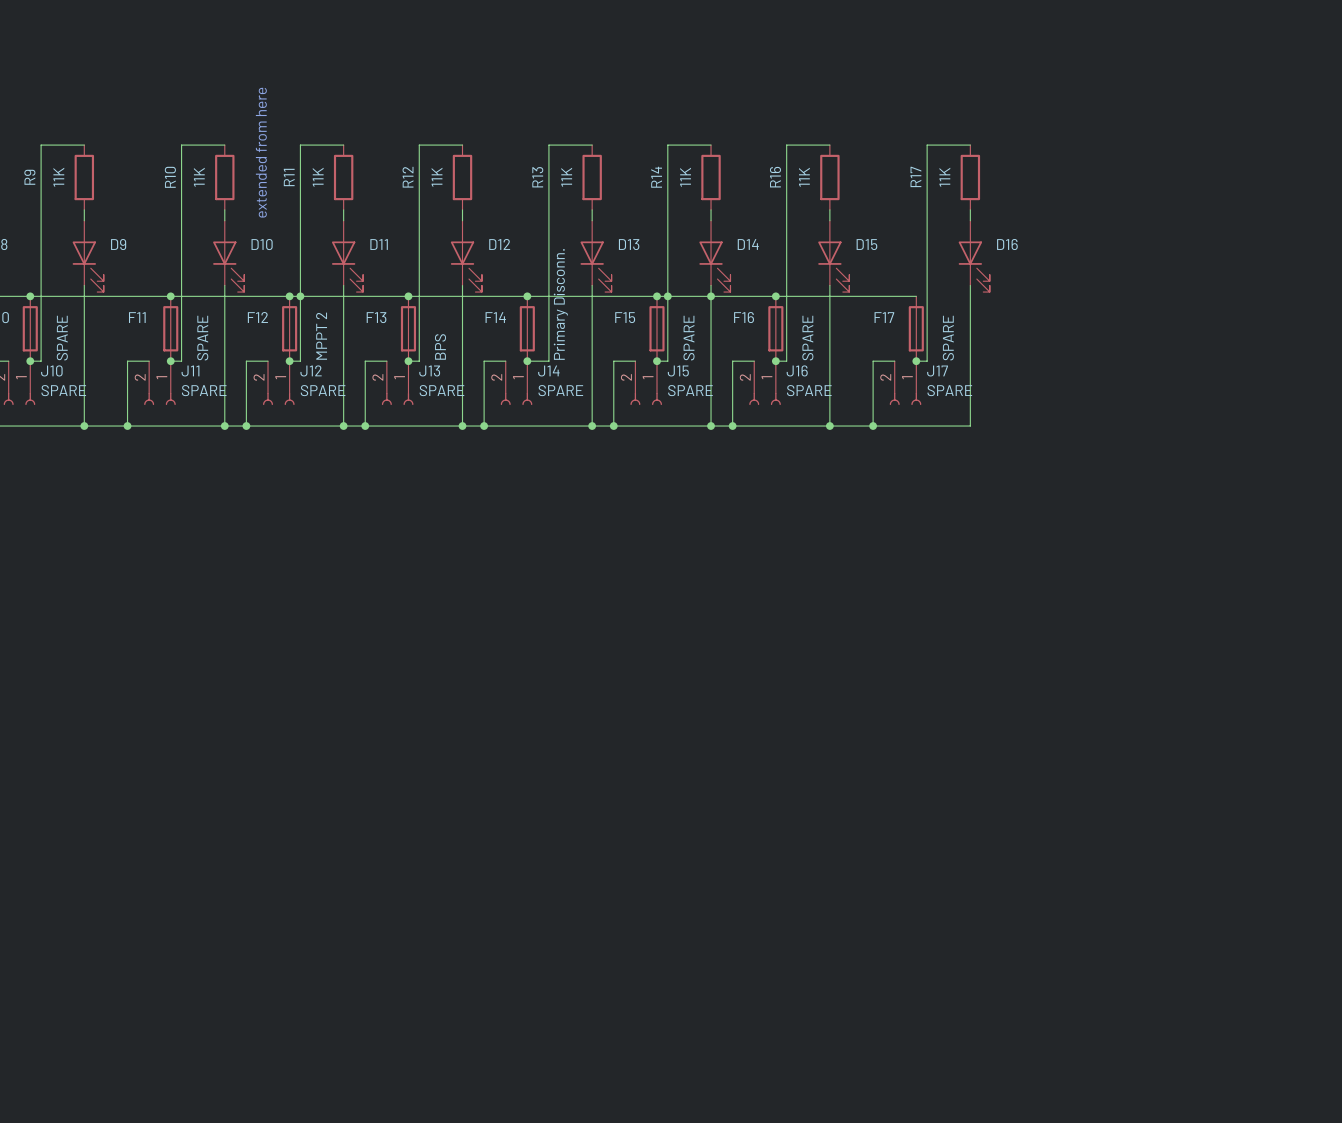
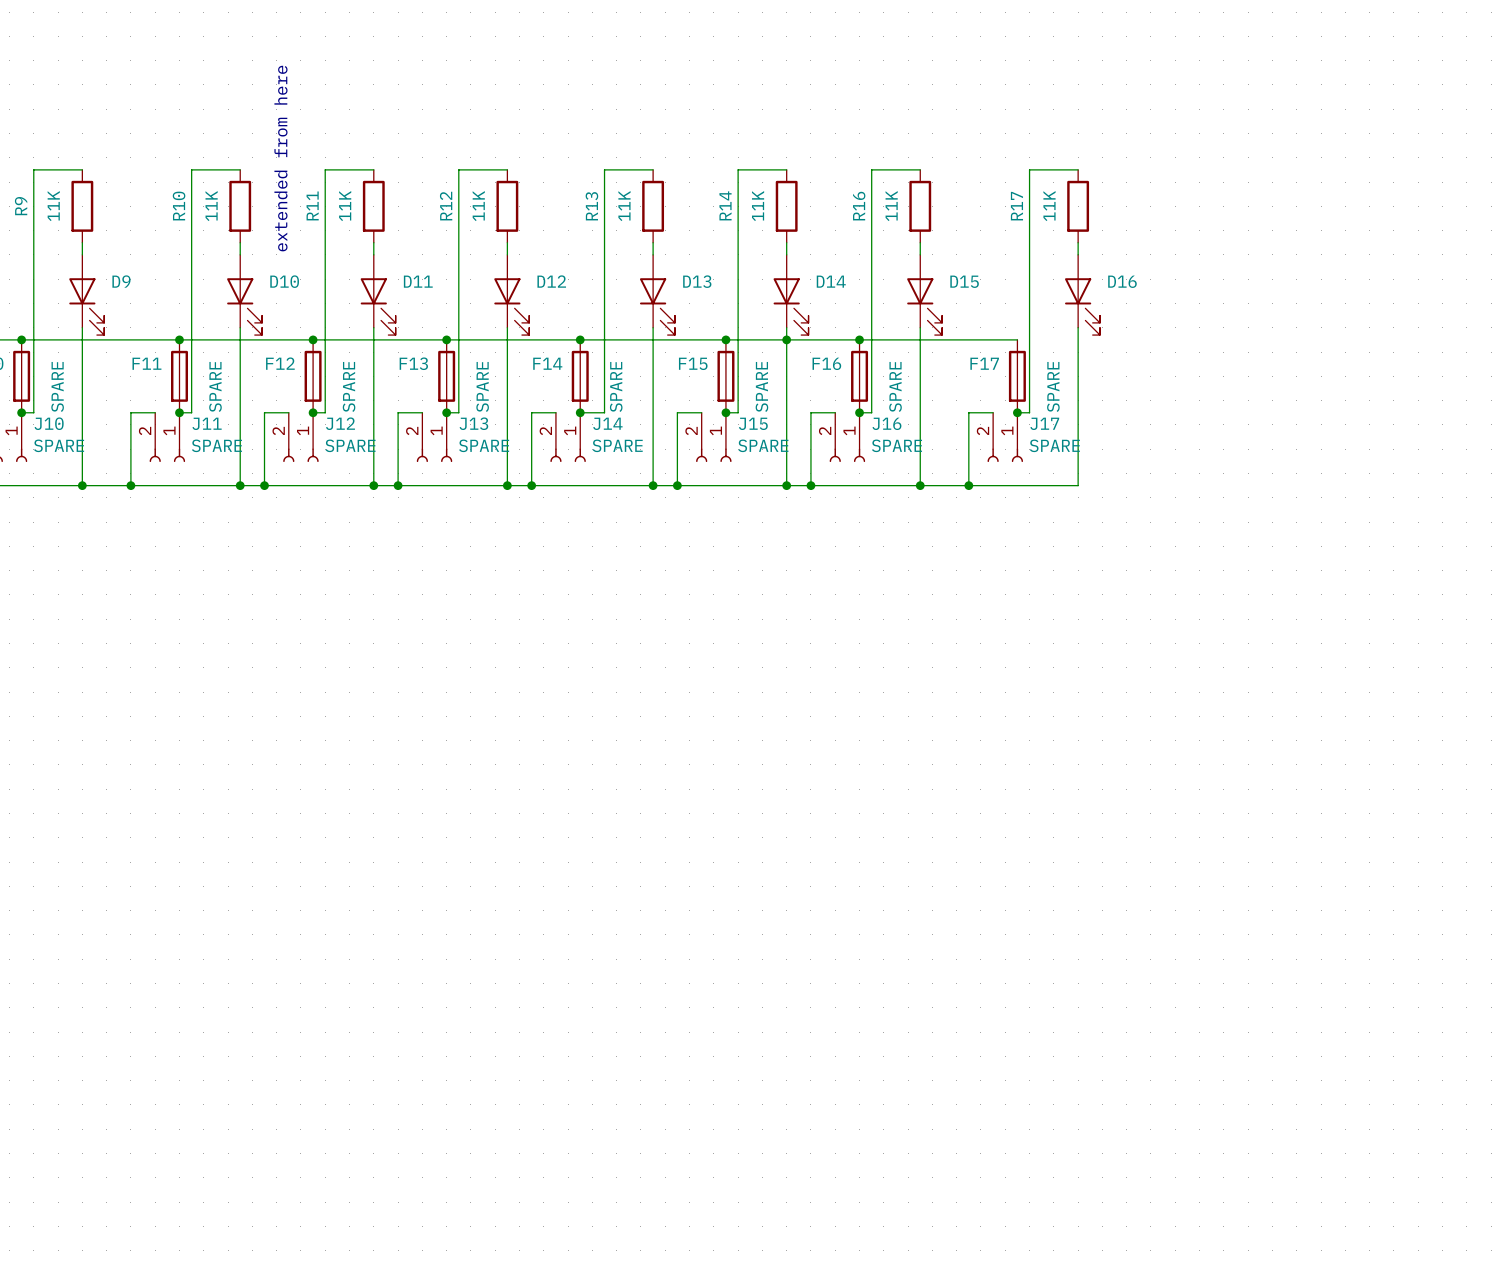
junction: (300, 296) -> none
junction: (667, 296) -> none
F14 value: Primary Disconn. (560, 304) -> SPARE (616, 386)
F12 value: MPPT 2 (321, 336) -> SPARE (349, 386)
F13 value: BPS (440, 346) -> SPARE (482, 386)

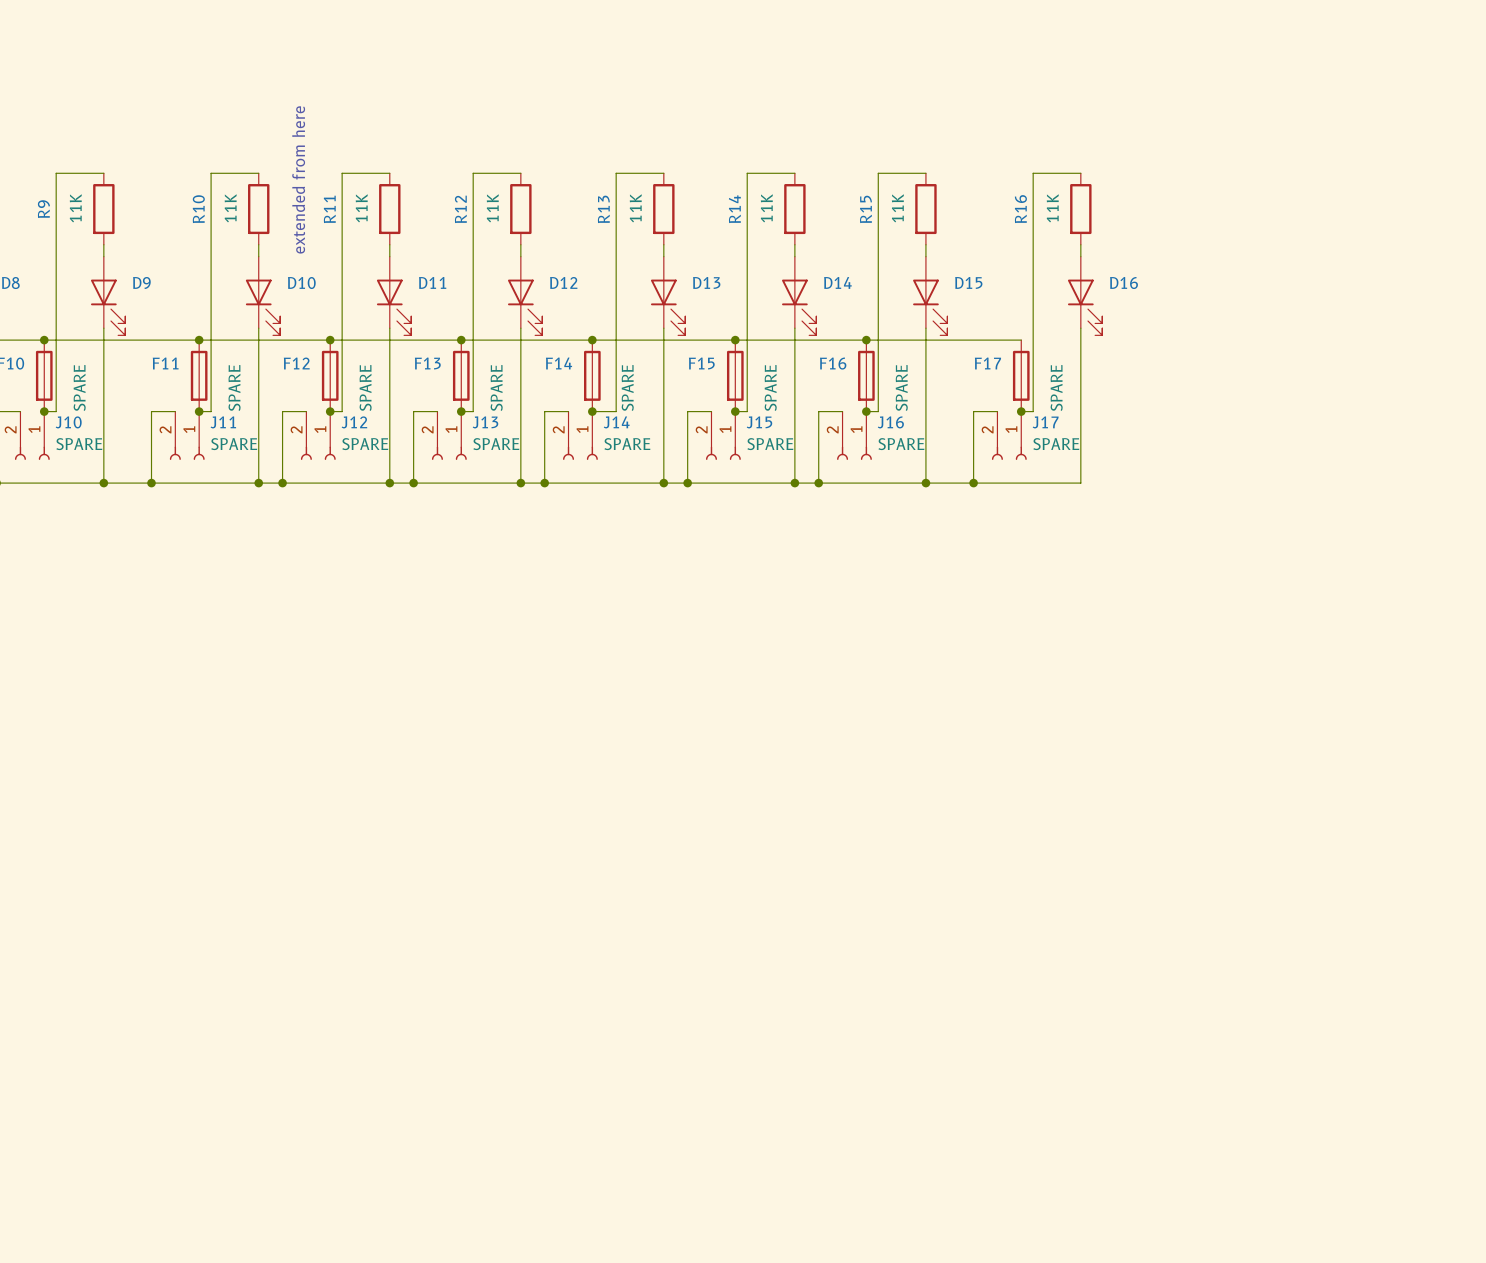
R16 name: R16 (859, 206) -> R15 (865, 209)
R17 name: R17 (1016, 206) -> R16 (1020, 209)
junction: (786, 339) -> none

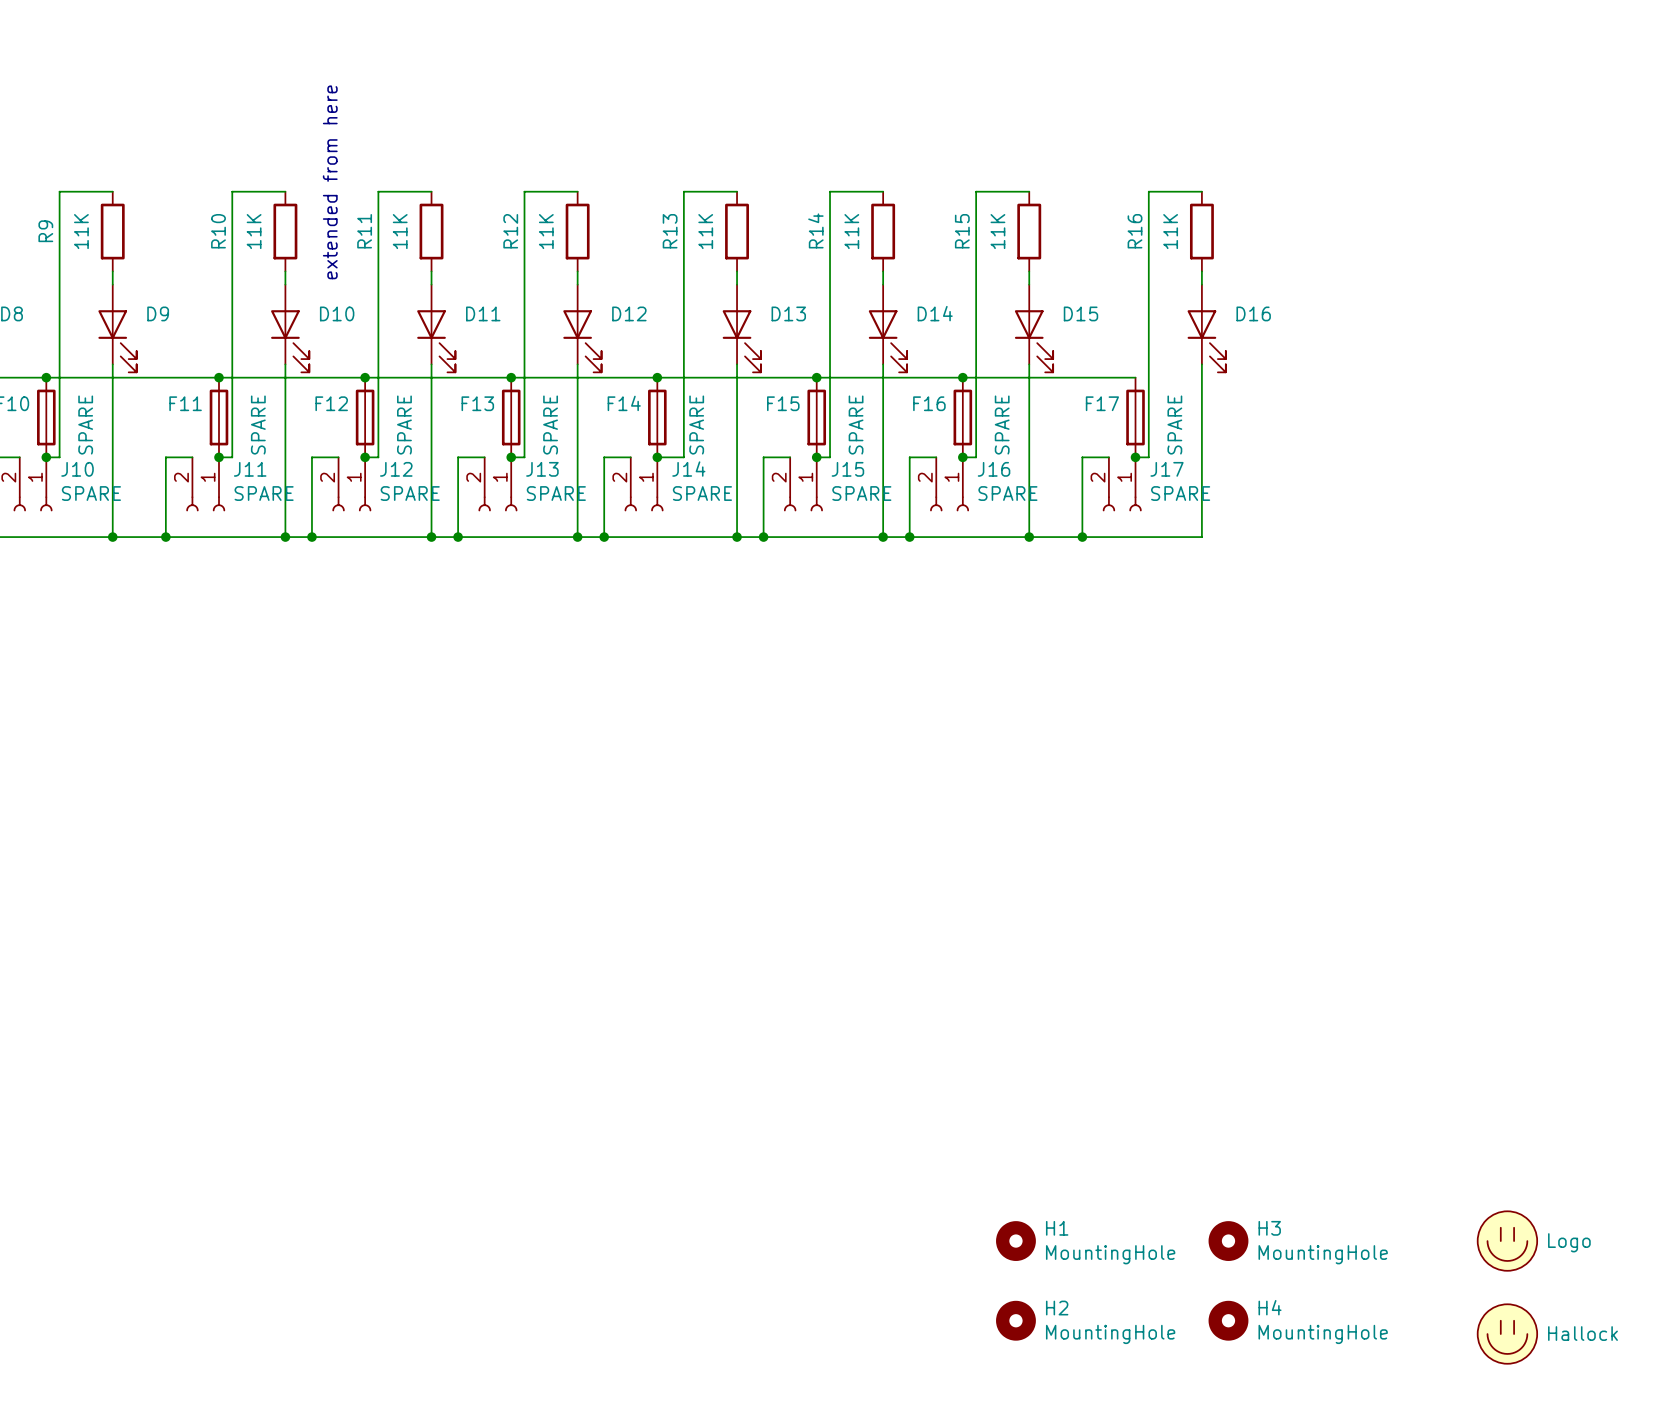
H1: none -> MountingHole (1015, 1241)
H3: none -> MountingHole (1228, 1241)
part: none -> Logo (1507, 1241)
H2: none -> MountingHole (1015, 1320)
H4: none -> MountingHole (1228, 1320)
part: none -> Hallock (1507, 1334)

